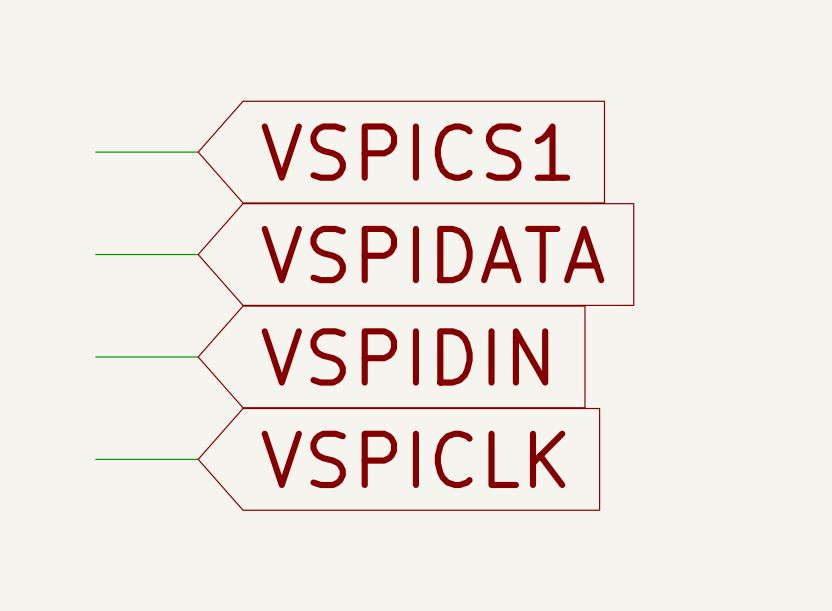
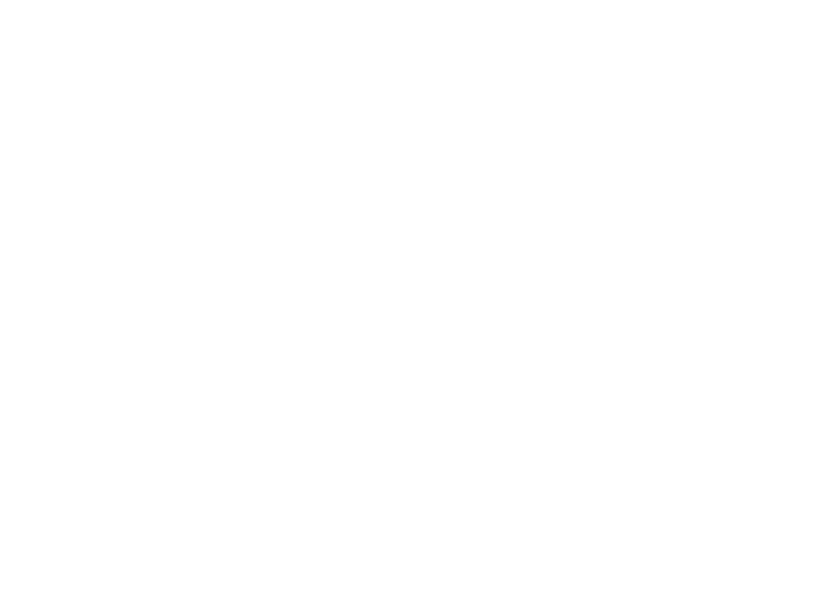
wire: (95, 152) (198, 152) -> none
global label: VSPICS1 (415, 152) -> none
wire: (95, 254) (198, 254) -> none
global label: VSPIDATA (432, 254) -> none
wire: (95, 356) (198, 356) -> none
global label: VSPIDIN (404, 356) -> none
wire: (95, 459) (198, 459) -> none
global label: VSPICLK (413, 459) -> none

